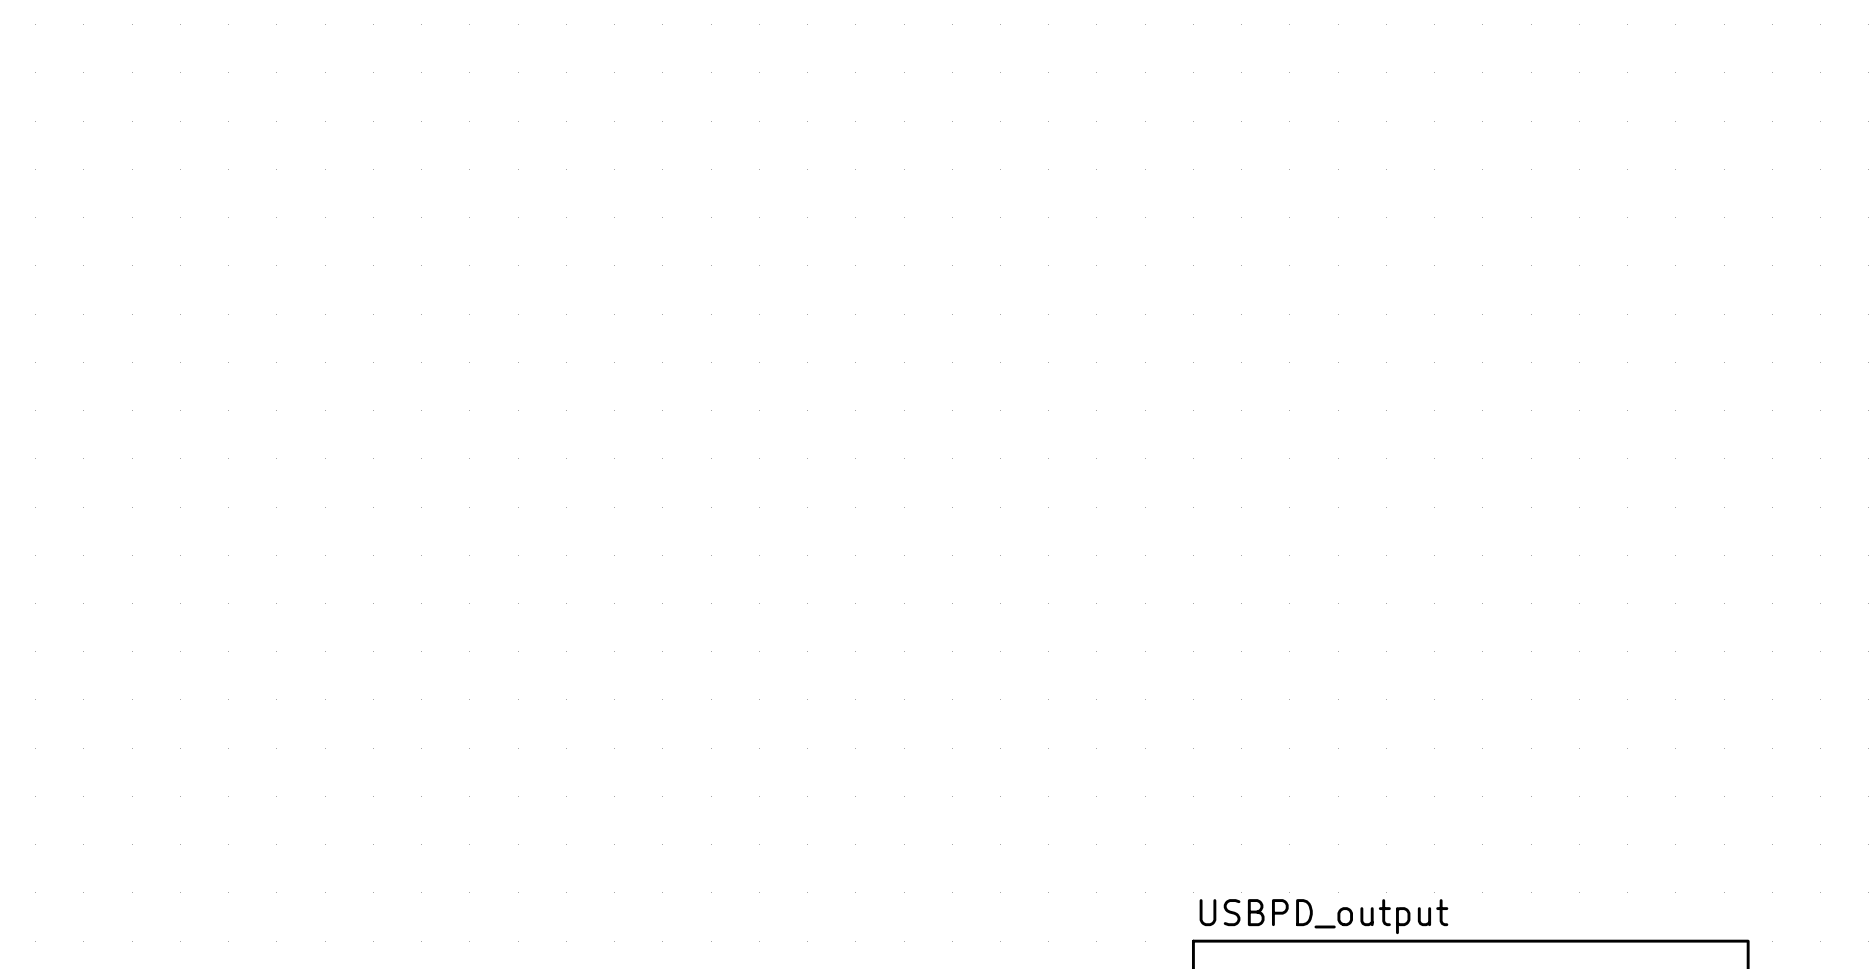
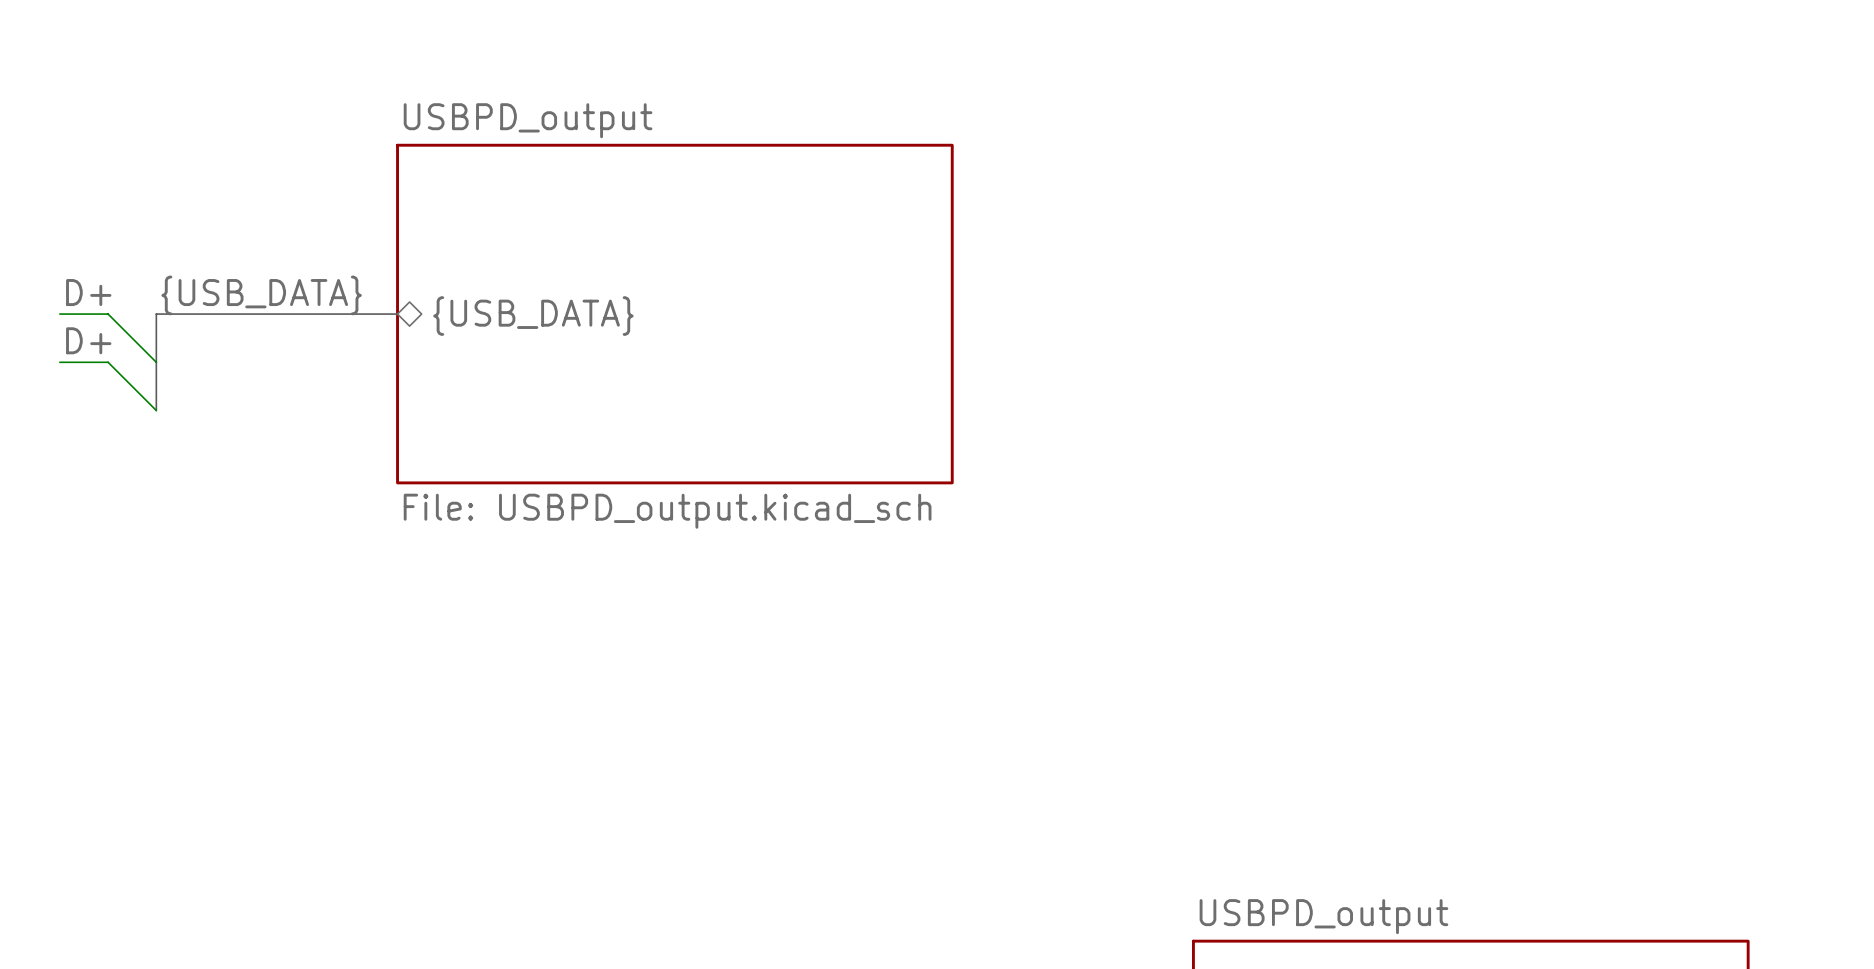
label: none -> D+ (88, 292)
label: none -> {USB_DATA} (261, 295)
wire: none -> (59, 314) (108, 314) (156, 362)
bus: none -> (397, 314) (156, 314) (156, 410)
sheet USBPD_output: none -> File: USBPD_output.kicad_sch (674, 314)
sheet pin: none -> {USB_DATA} (533, 316)
label: none -> D+ (88, 340)
wire: none -> (59, 362) (108, 362) (156, 410)

